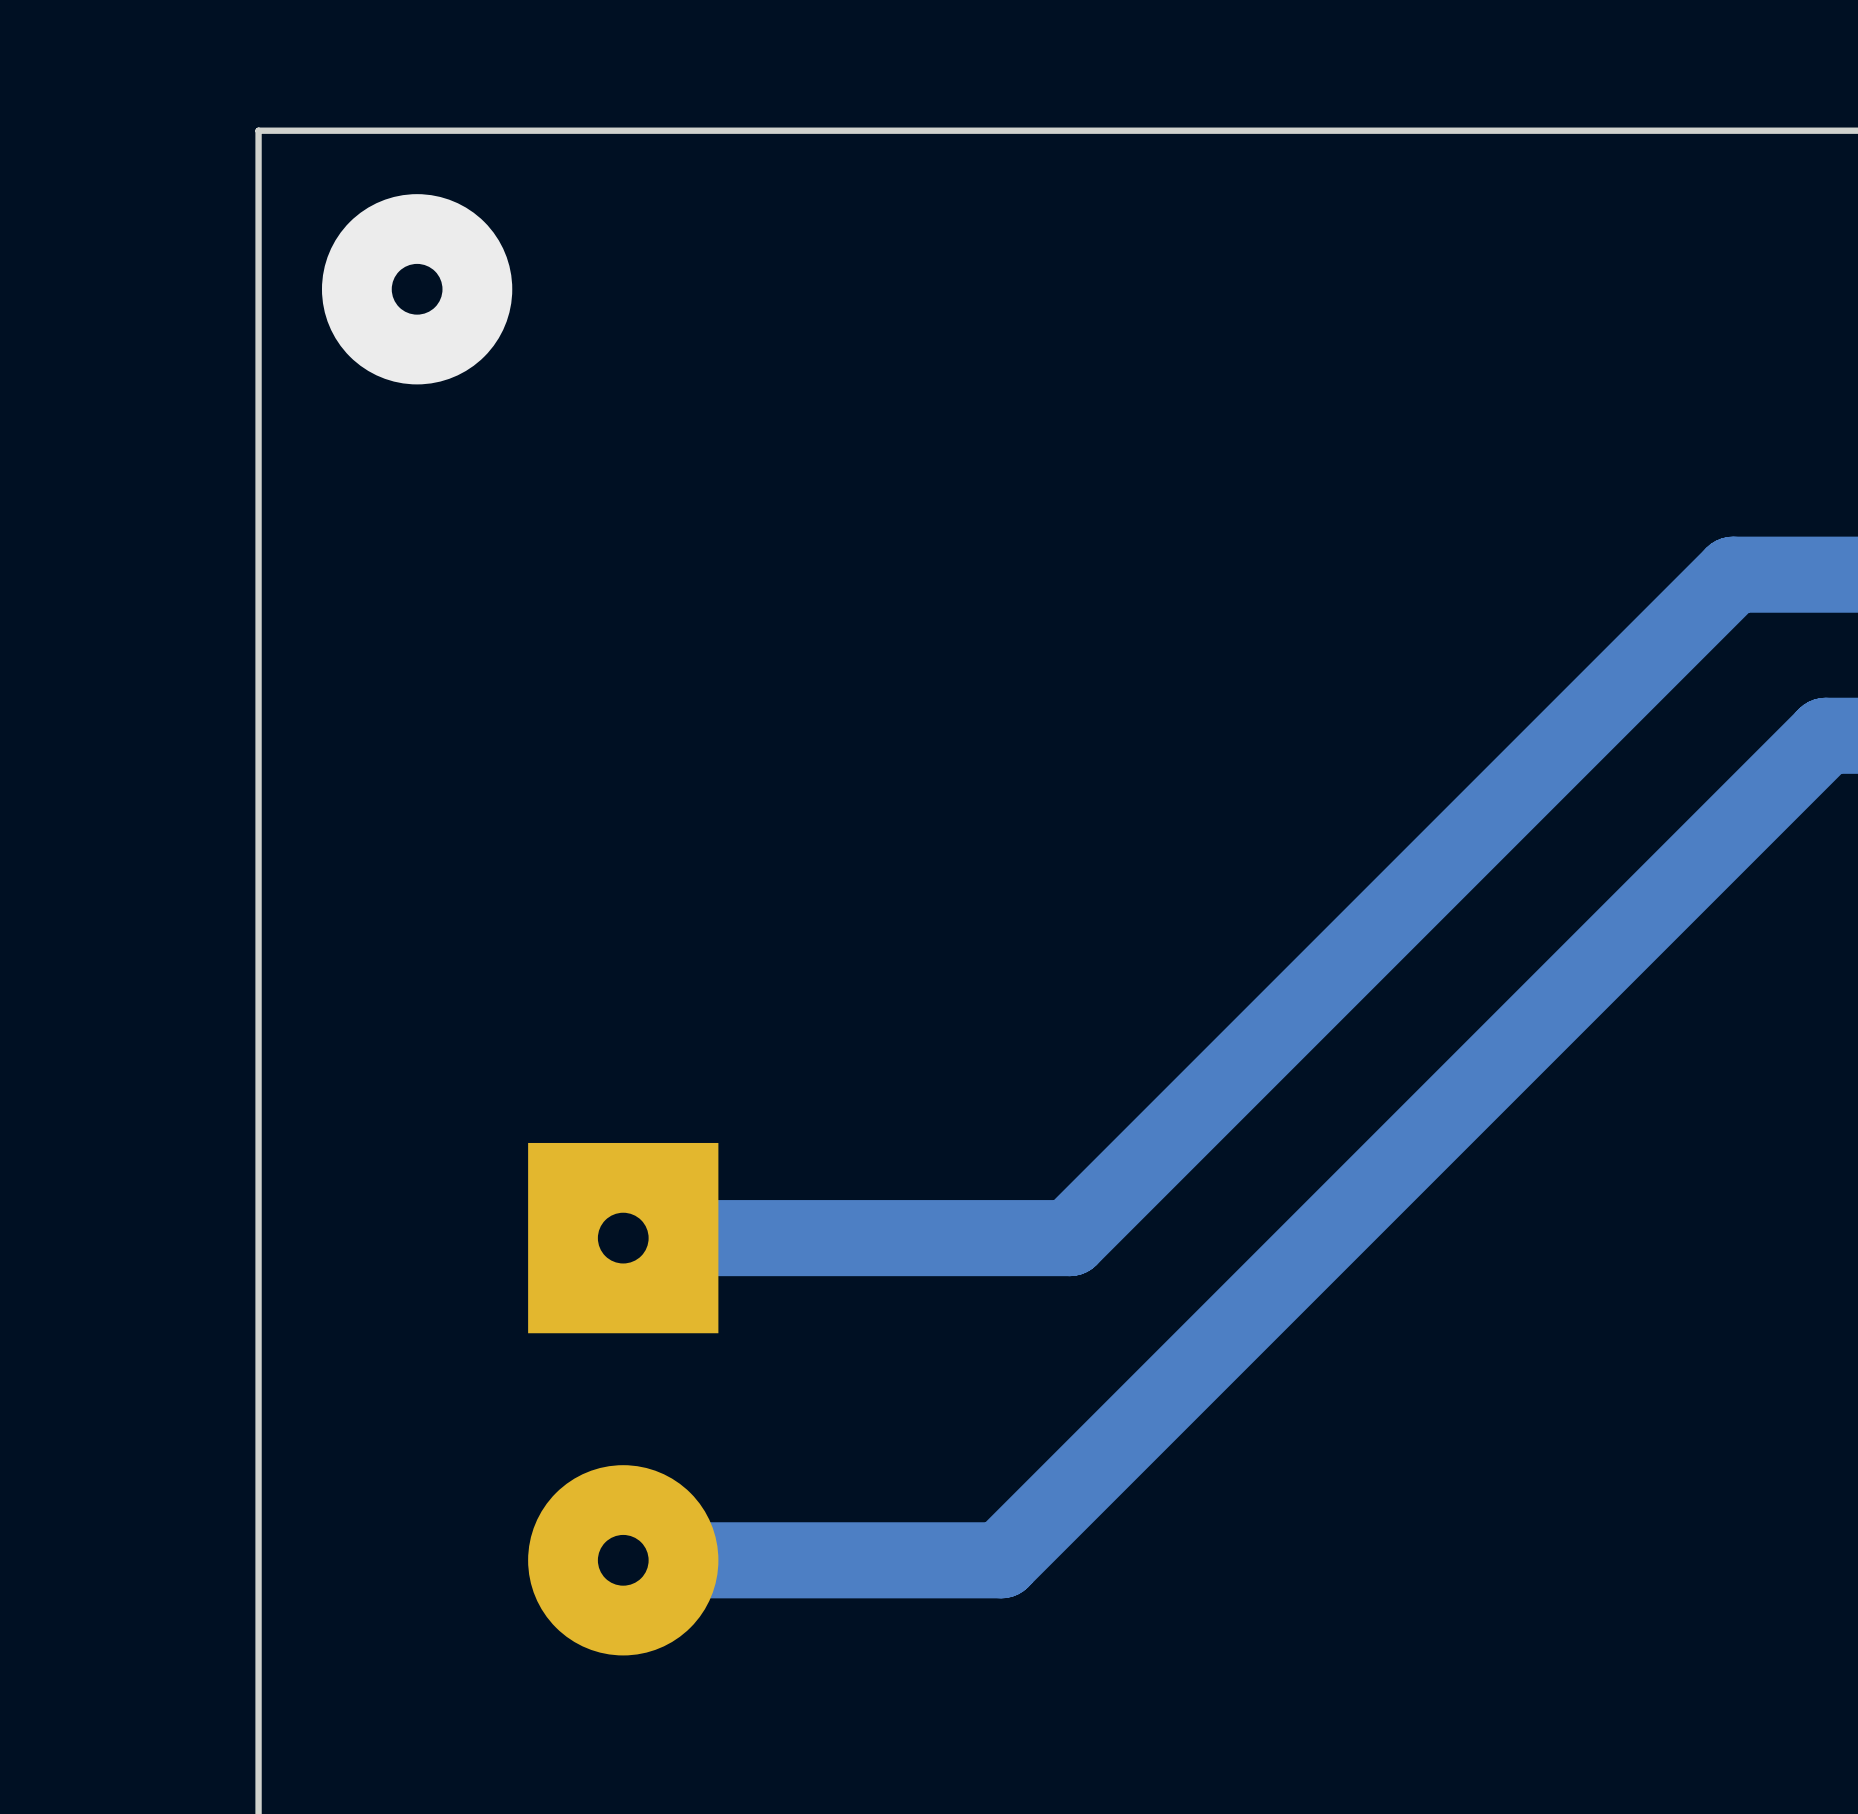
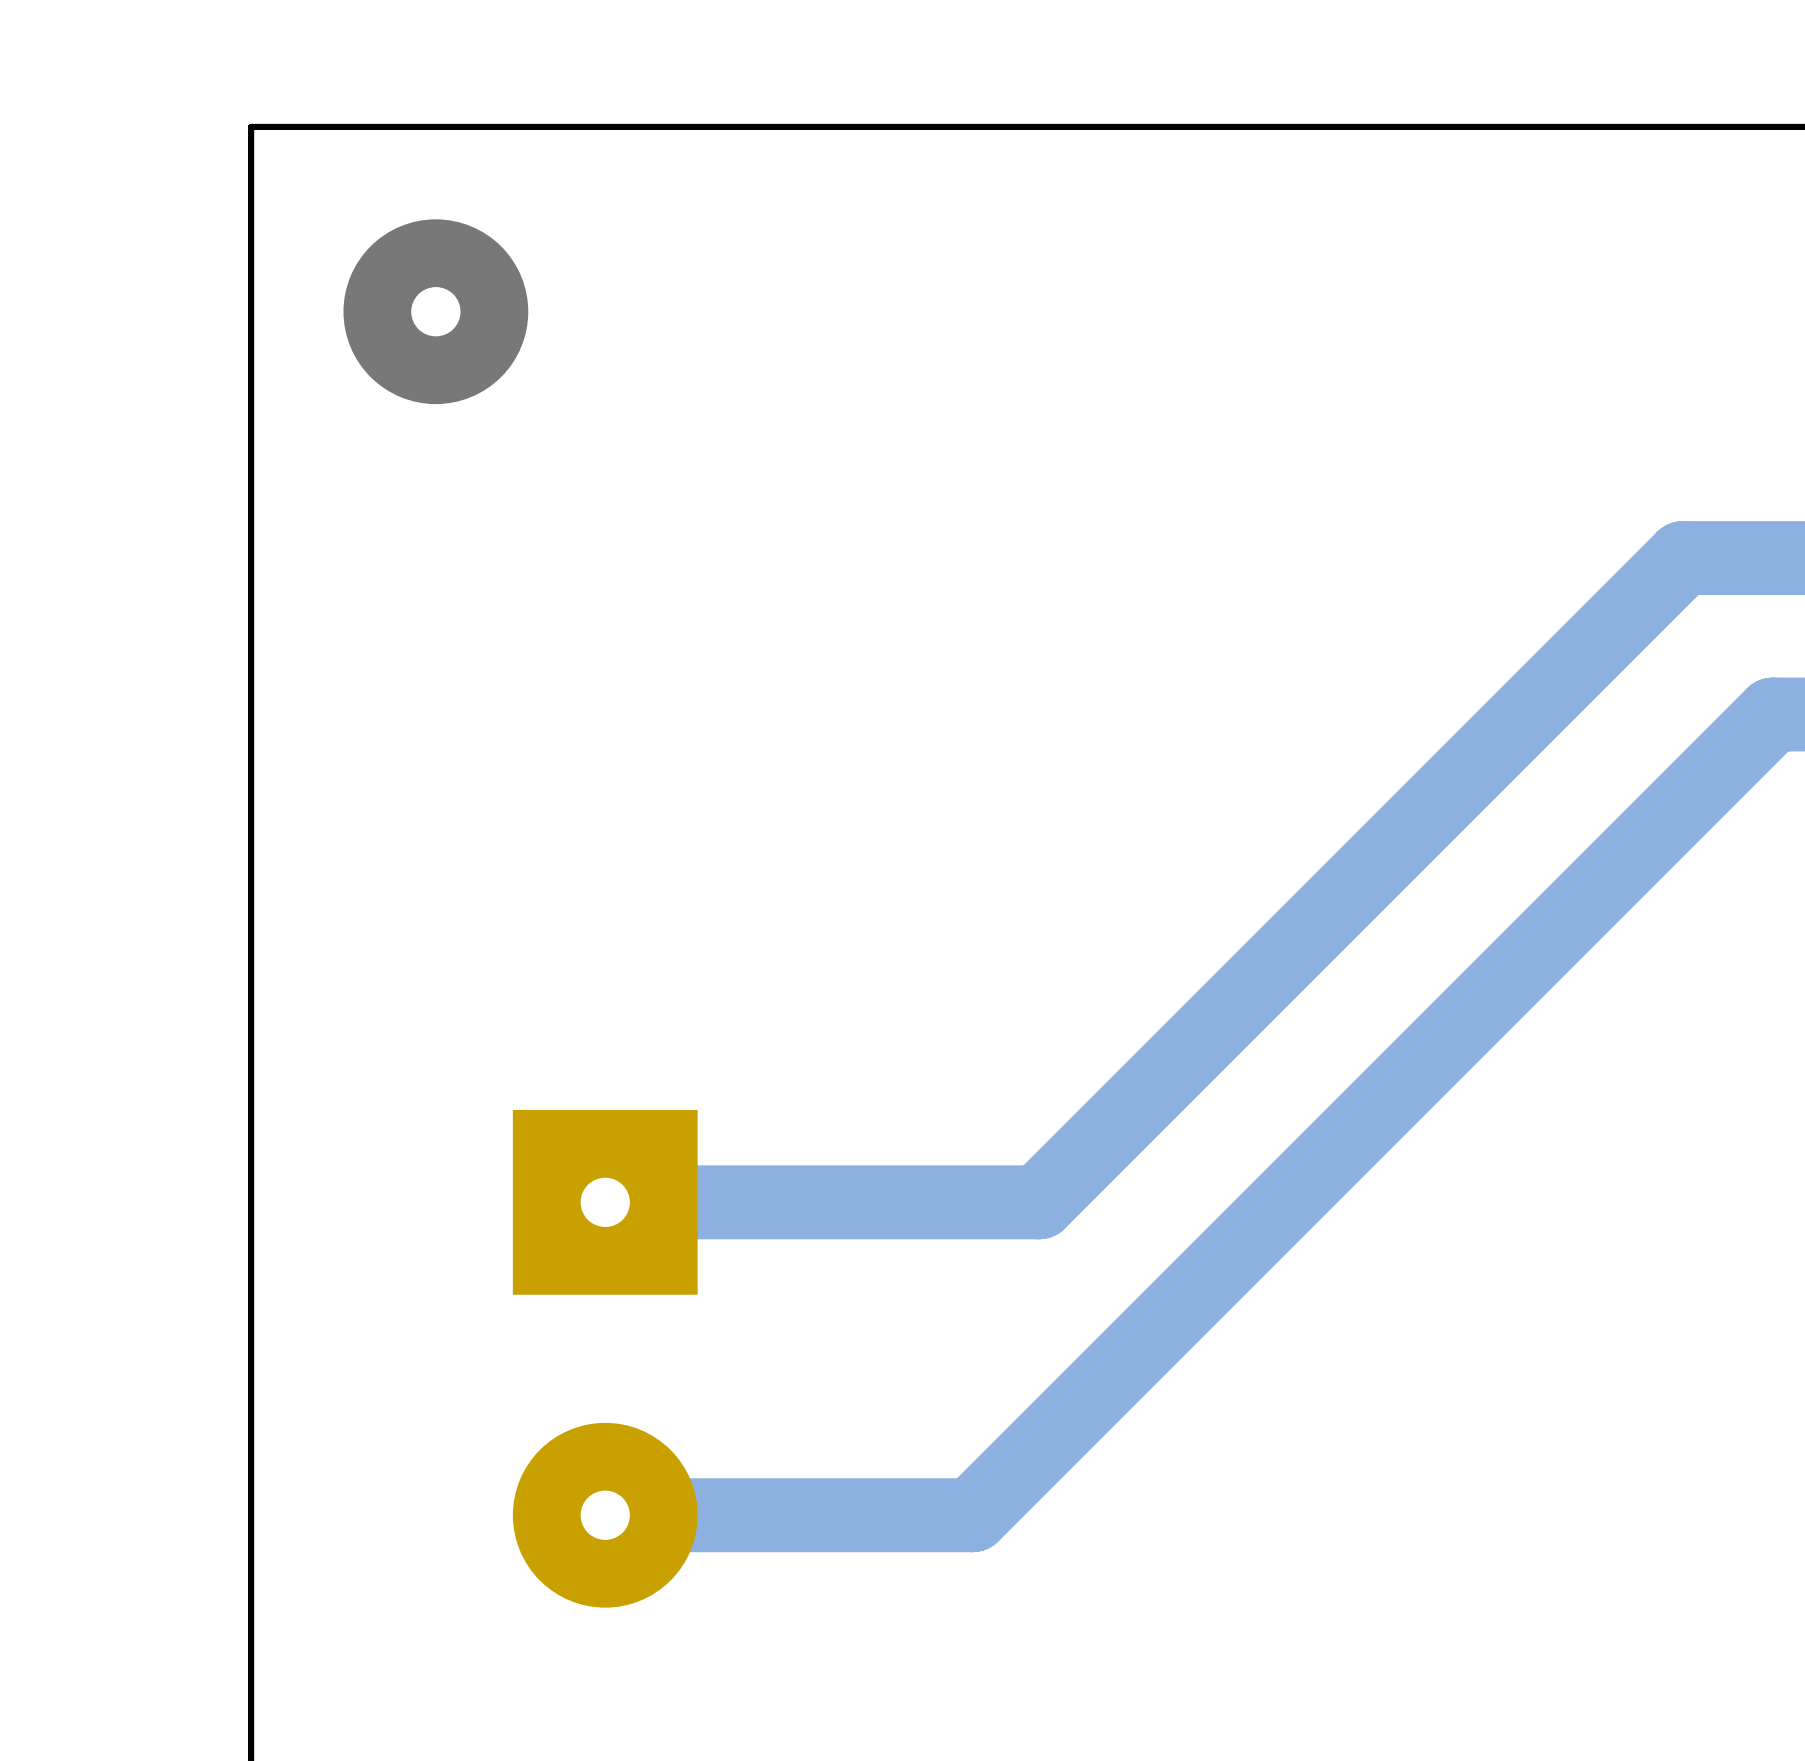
via position: (417, 289) -> (435, 311)

